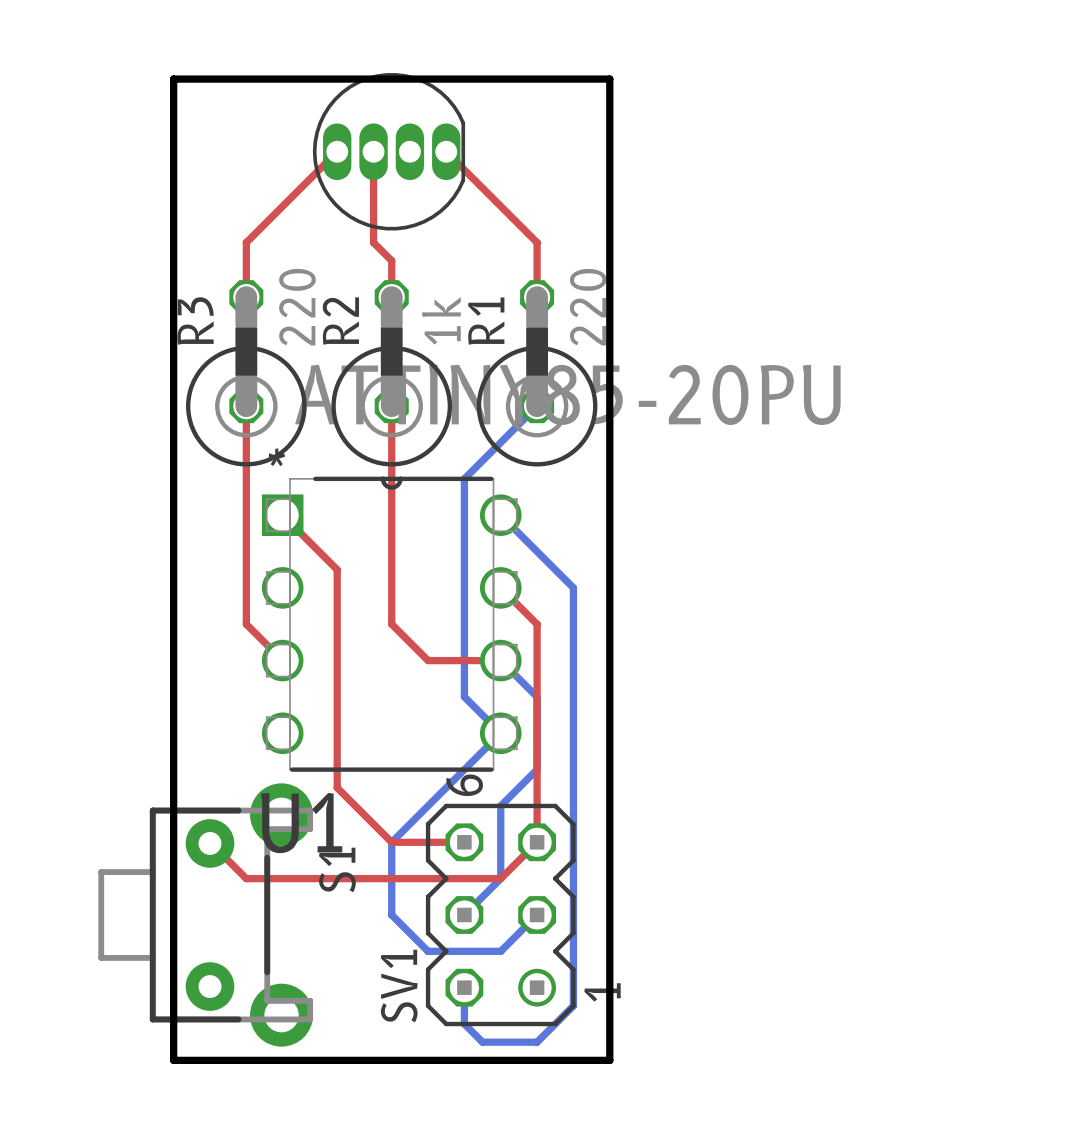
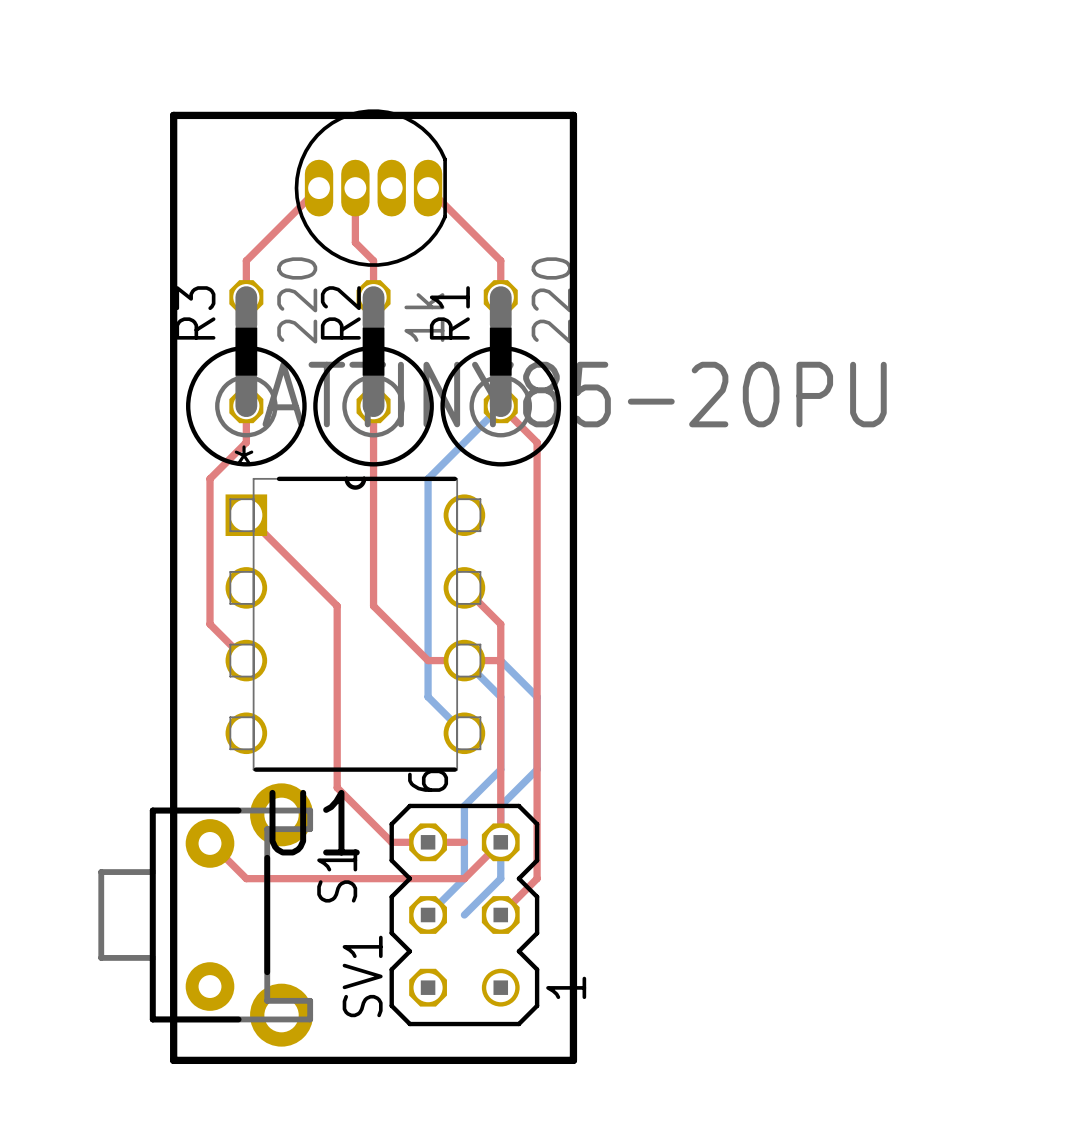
board edge: (173, 115) (173, 79) (609, 79) (609, 1060) (573, 1060) -> (173, 115) (573, 115) (573, 1060)
top track: (337, 151) (246, 242) (246, 260) -> (319, 188) (246, 260)
top track: (373, 151) (373, 242) (391, 260) (391, 297) -> none
part position: (388, 151) -> (370, 188)
top track: (446, 151) (537, 242) (537, 297) -> none
top track: none -> (355, 188) (355, 242) (373, 260) (373, 297)
top track: none -> (428, 188) (500, 260) (500, 297)
R2 position: (391, 373) -> (373, 373)
R1 position: (537, 373) -> (500, 373)
top track: (391, 406) (391, 624) -> (373, 406) (373, 606) (391, 624)
bottom track: none -> (500, 406) (428, 478) (428, 696) (464, 733)
bottom track: (537, 406) (464, 478) (464, 696) (500, 733) (391, 842) (391, 914) (428, 951) (500, 951) (537, 914) -> none
top track: (246, 442) (246, 624) (282, 660) -> (246, 442) (210, 478) (210, 624) (246, 660)
top track: (282, 515) (337, 569) (337, 606) -> (246, 515) (337, 606)
bottom track: (500, 515) (573, 587) (573, 1005) (537, 1042) (482, 1042) (464, 1024) (464, 987) -> none
top track: none -> (464, 587) (500, 624) (500, 842) (464, 878)
top track: (500, 587) (537, 624) -> (500, 406) (537, 442) (537, 624)
U1 position: (391, 624) -> (355, 624)
bottom track: none -> (464, 660) (500, 696) (500, 769) (464, 805) (464, 878) (428, 914)
top track: (537, 842) (500, 878) (464, 878) -> (537, 842) (537, 878) (500, 914)
SV1 position: (500, 914) -> (464, 914)

